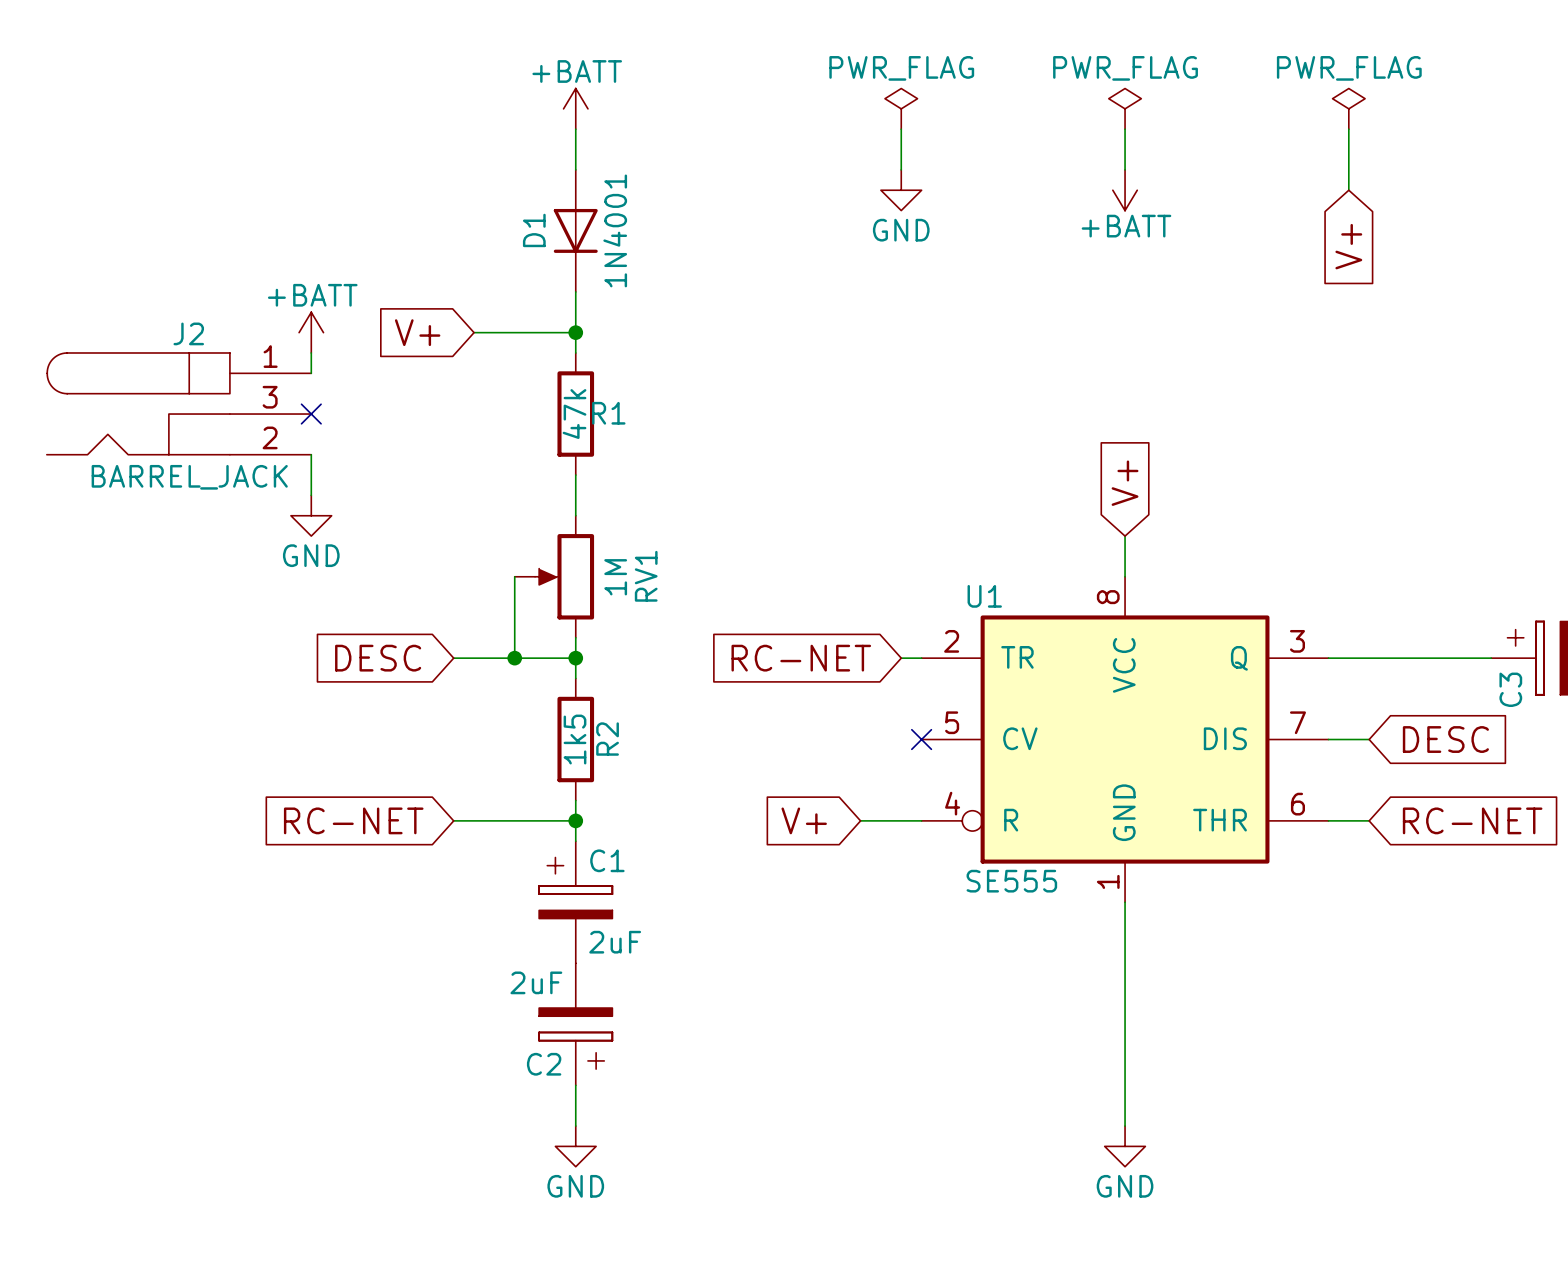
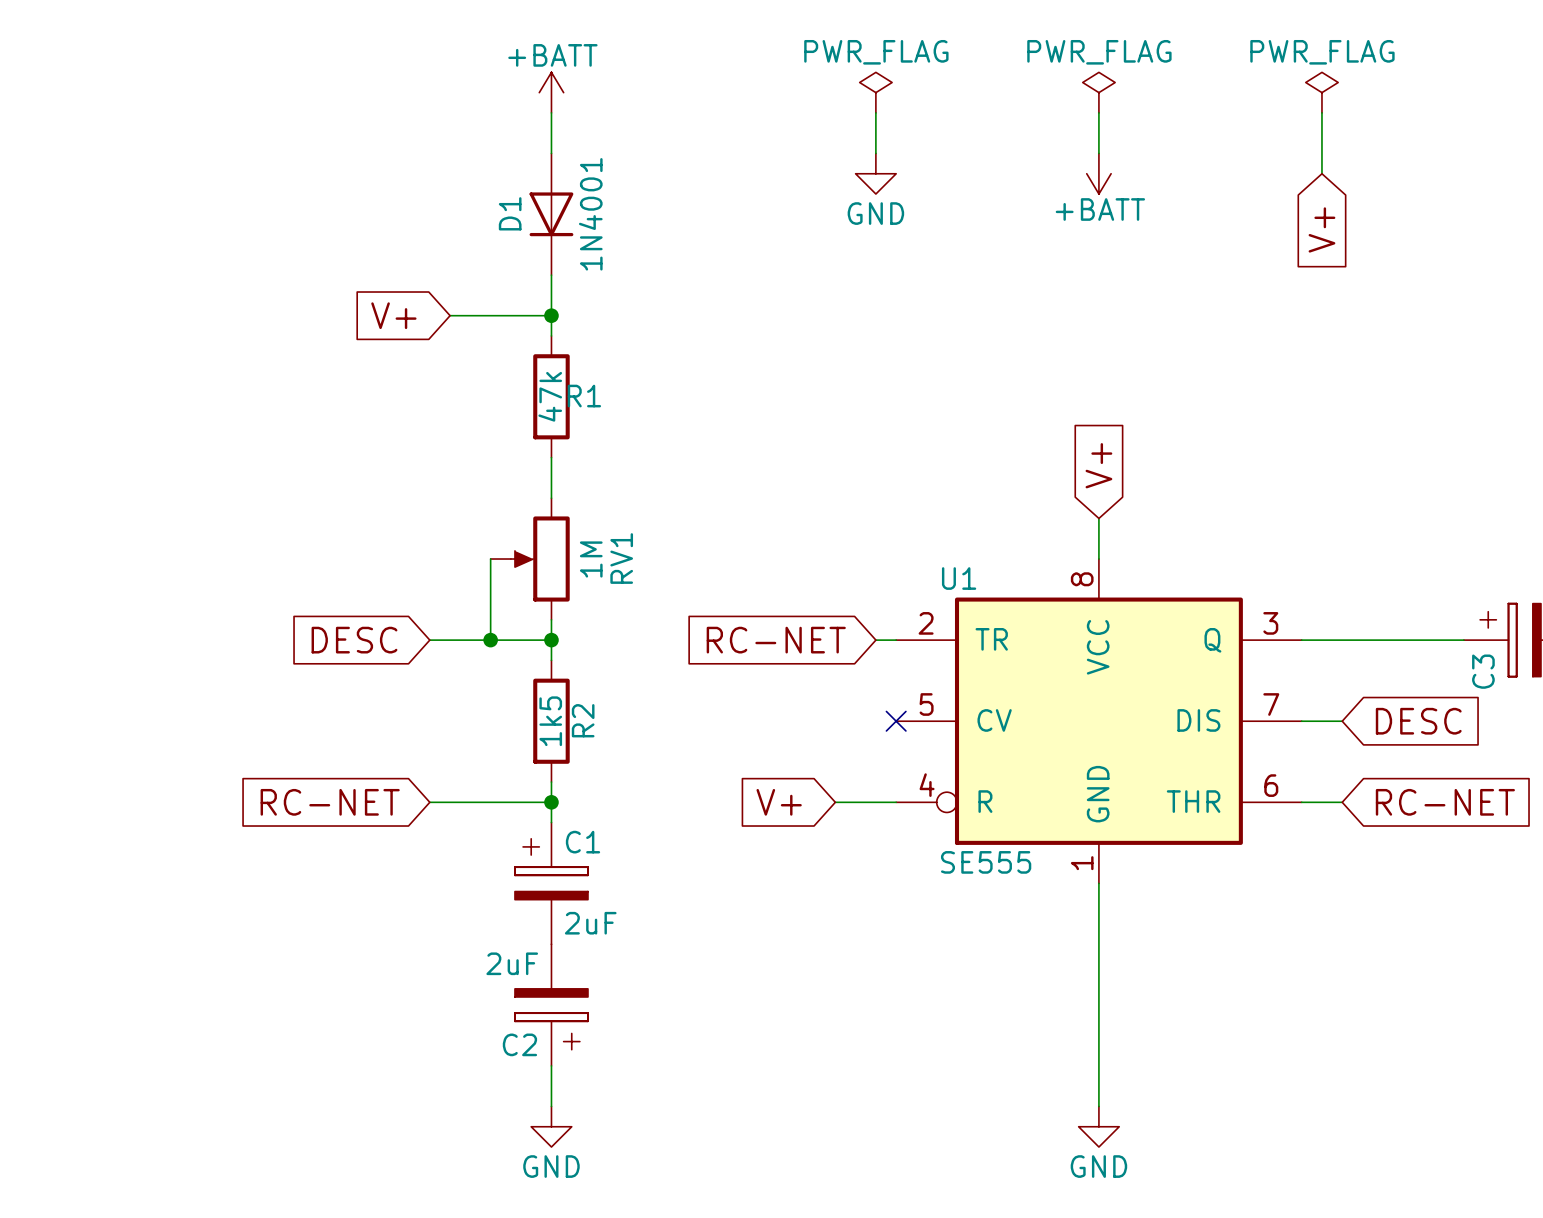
power symbol: +BATT (311, 332) -> none
wire: (311, 352) (311, 373) -> none
J2: BARREL_JACK (179, 403) -> none
no-connect mark: (311, 414) -> none
wire: (311, 454) (311, 495) -> none
power symbol: GND (311, 515) -> none

